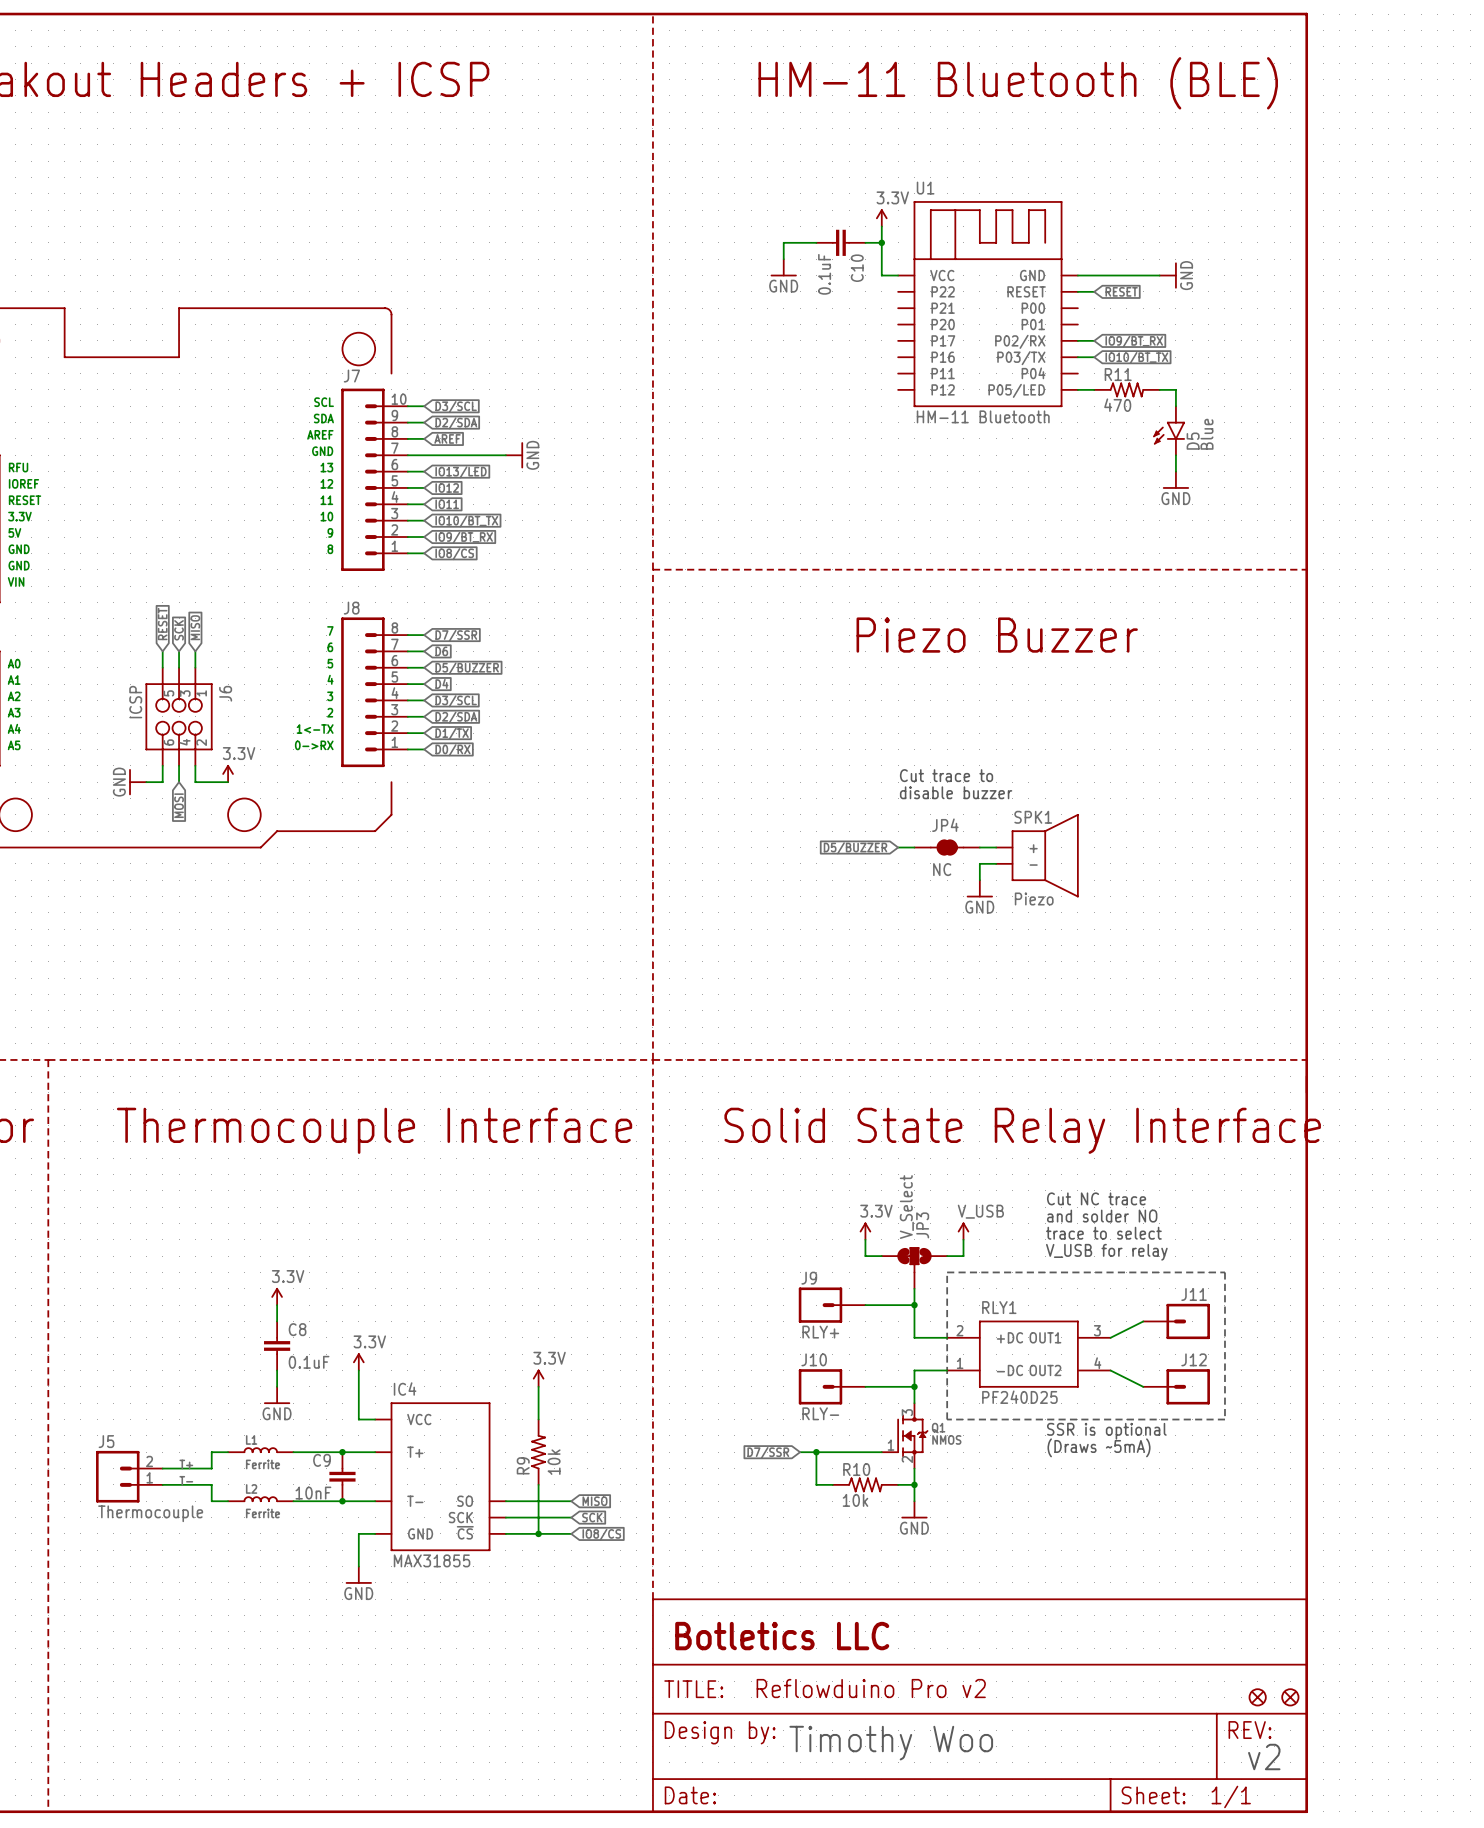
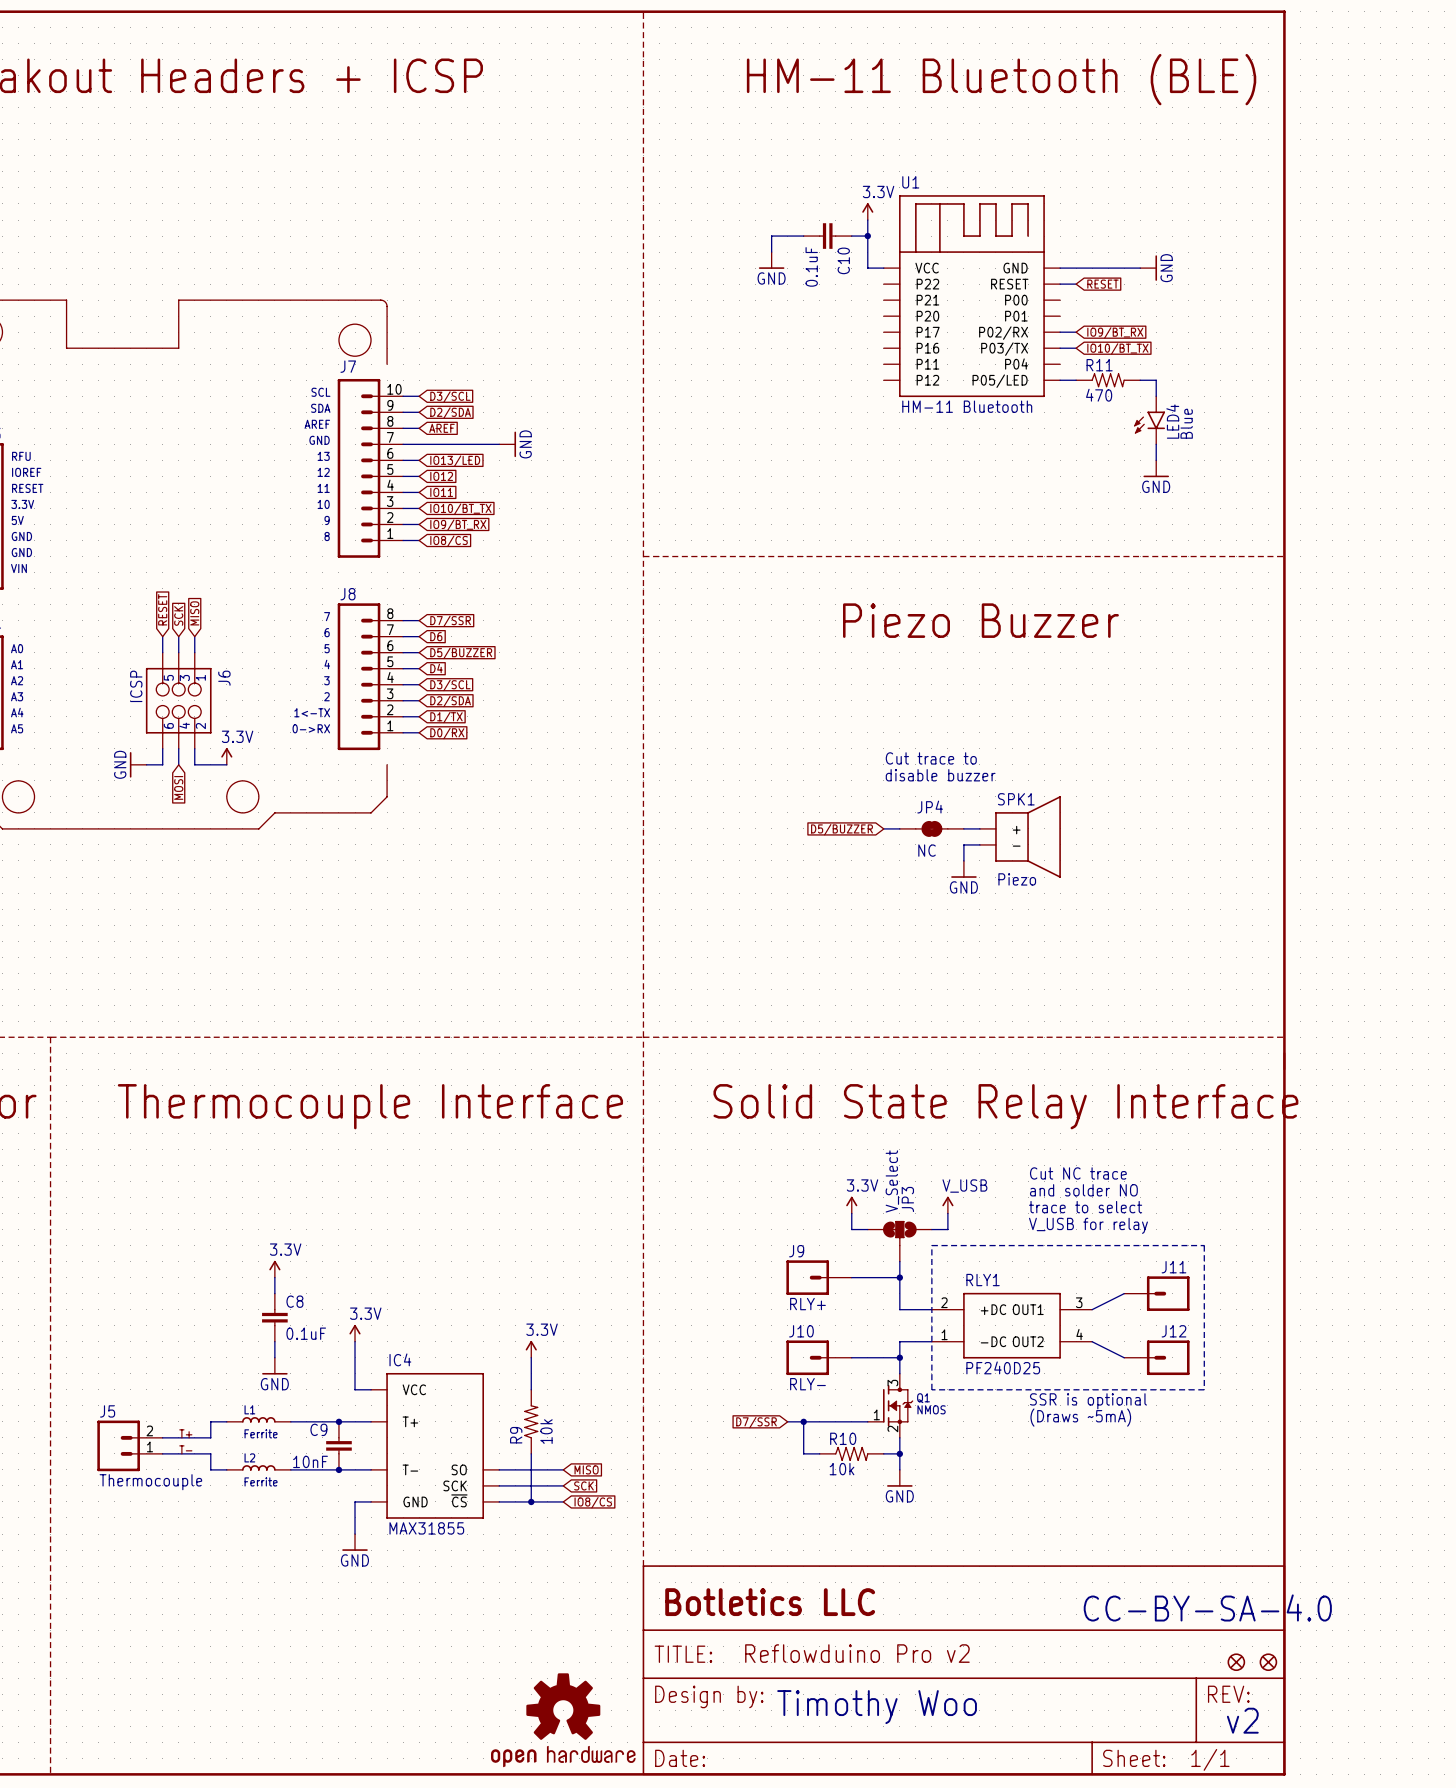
D5 name: D5 (1193, 441) -> LED4 (1172, 421)
text: none -> CC-BY-SA-4.0 (1207, 1607)
part: none -> (563, 1720)

